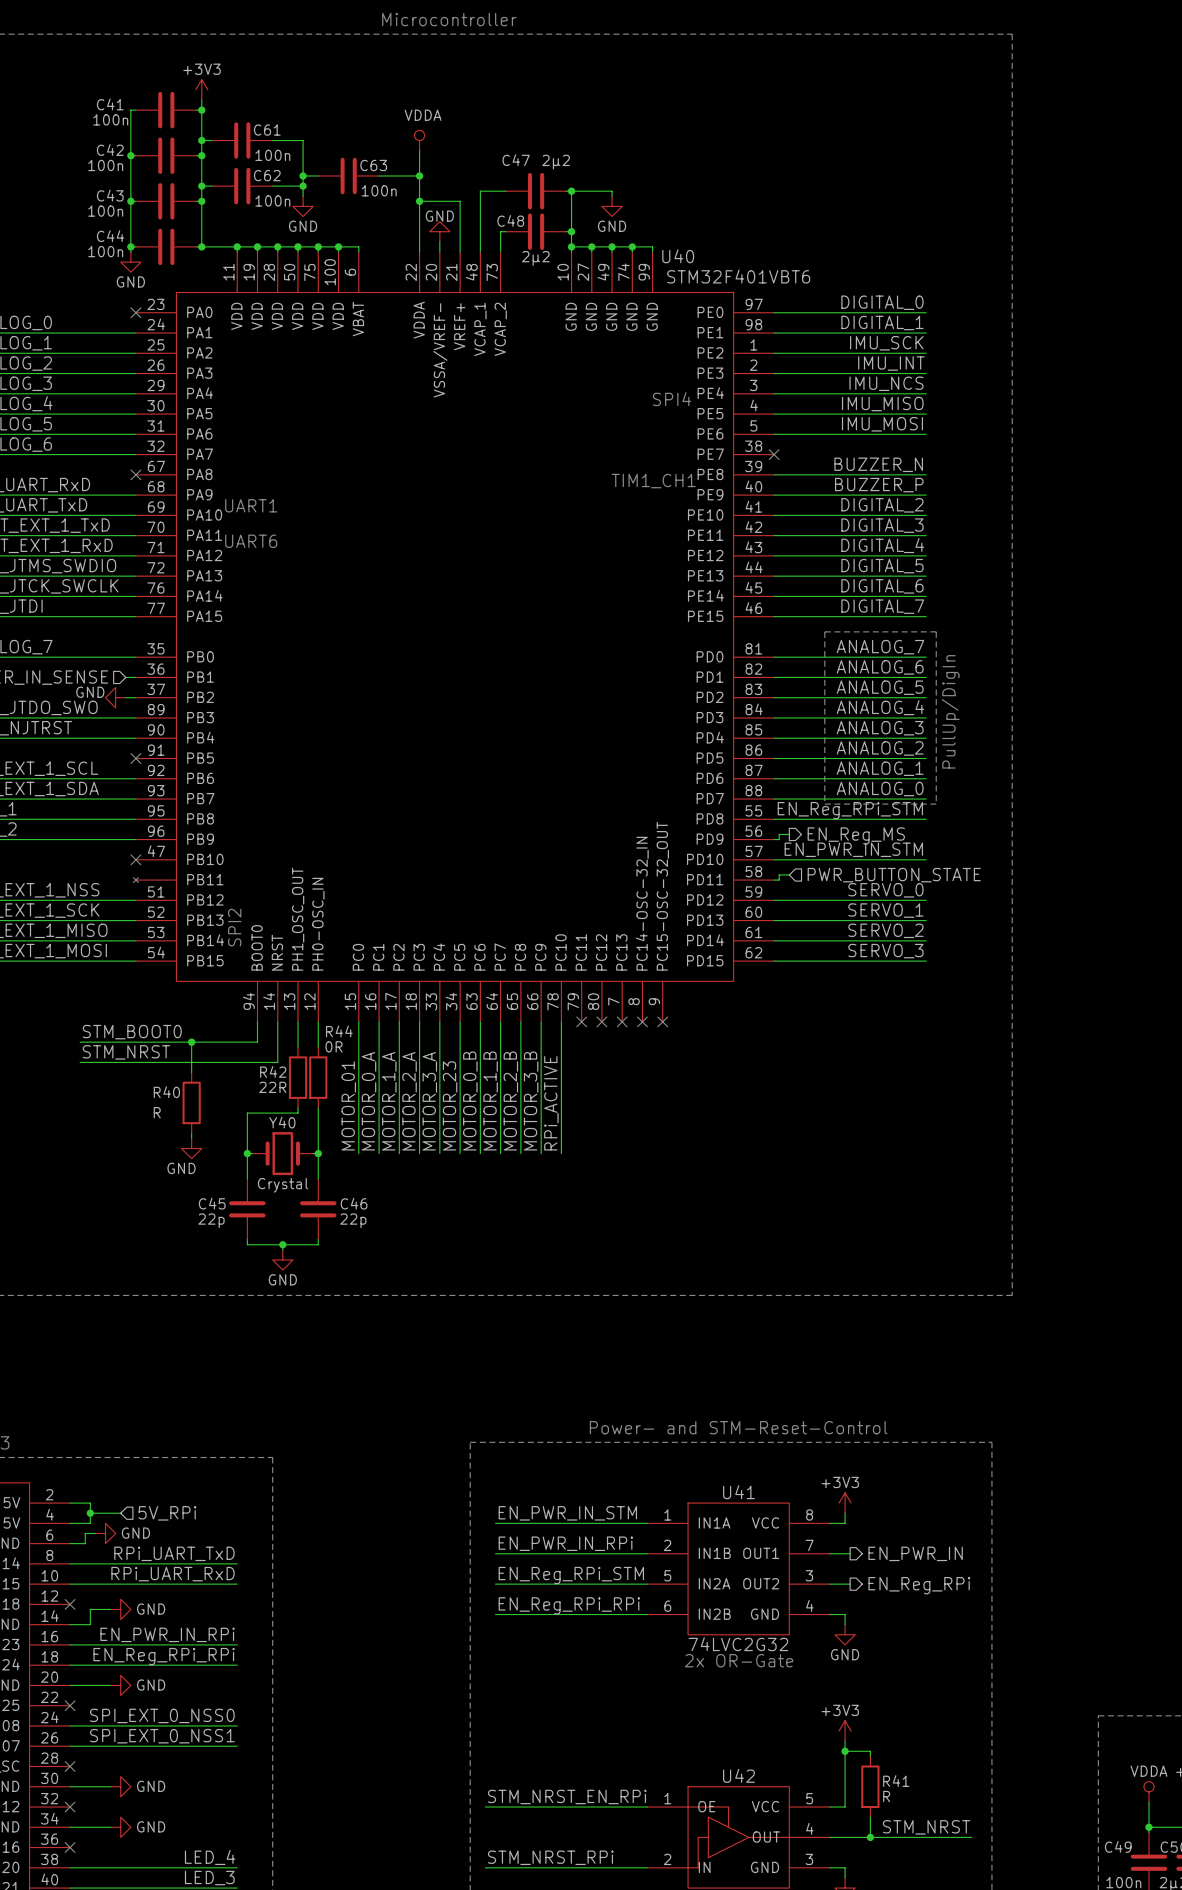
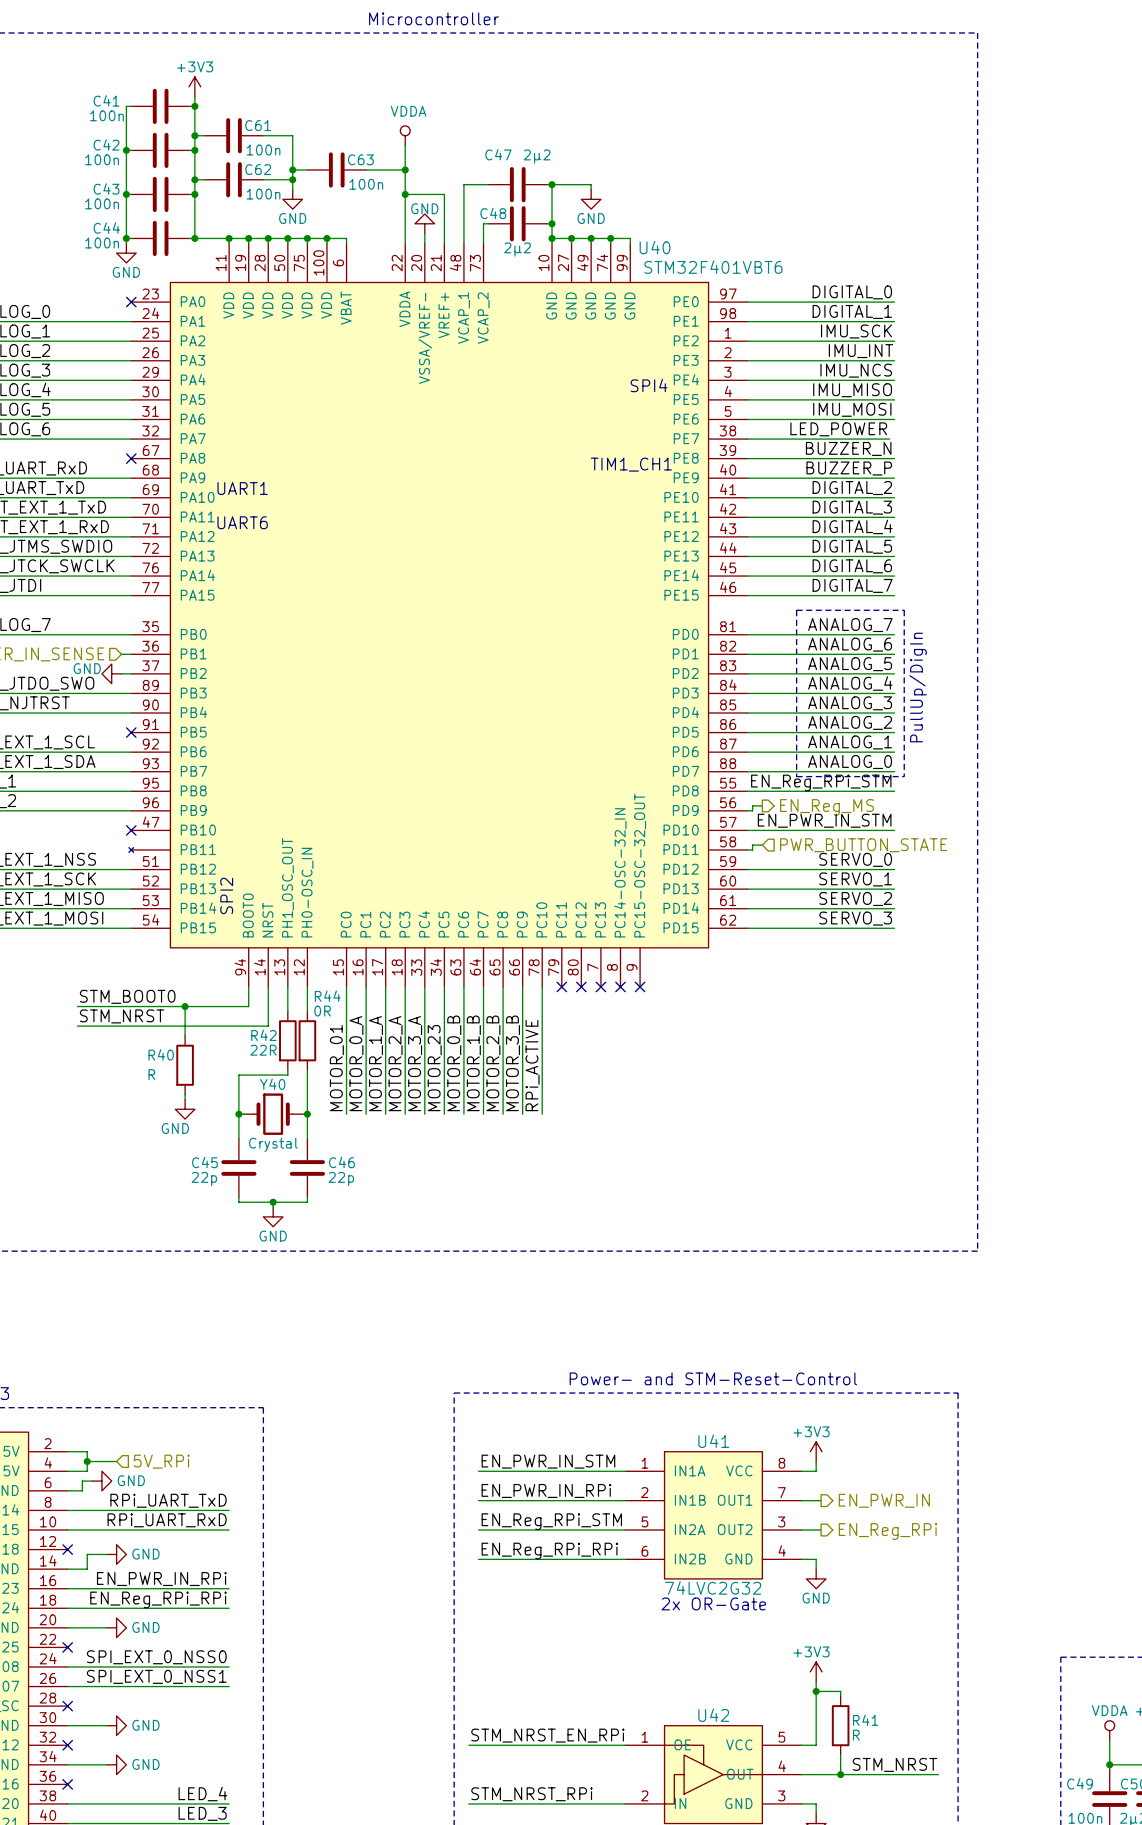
label: none -> LED_POWER (838, 429)
wire: none -> (747, 439) (889, 439)
no-connect mark: (774, 454) -> none

